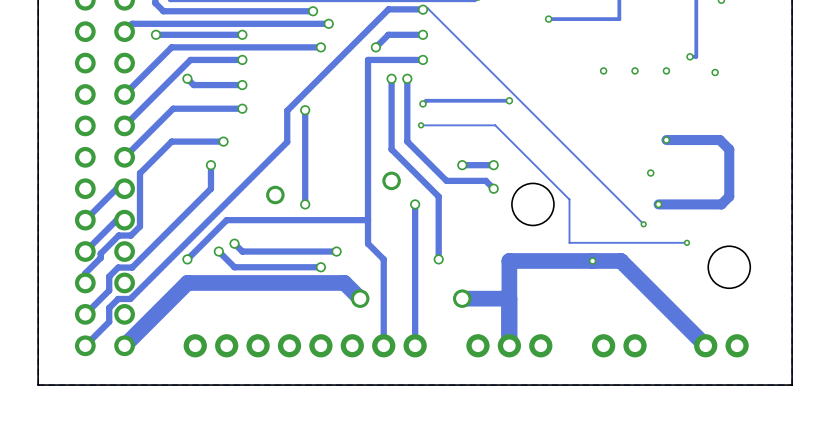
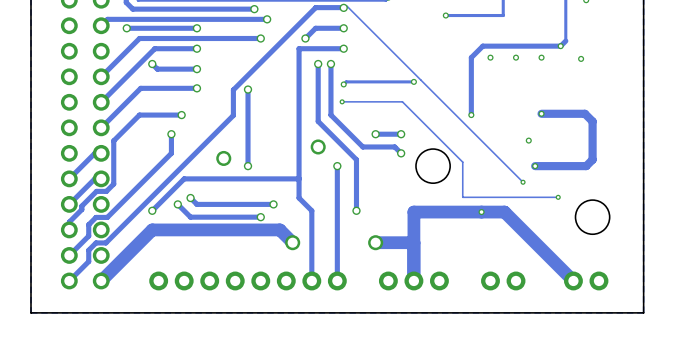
track: (696, 50) (696, 56) (690, 56) -> (565, 41) (560, 46) (482, 46) (471, 57) (471, 115)
via: none -> (471, 115)

